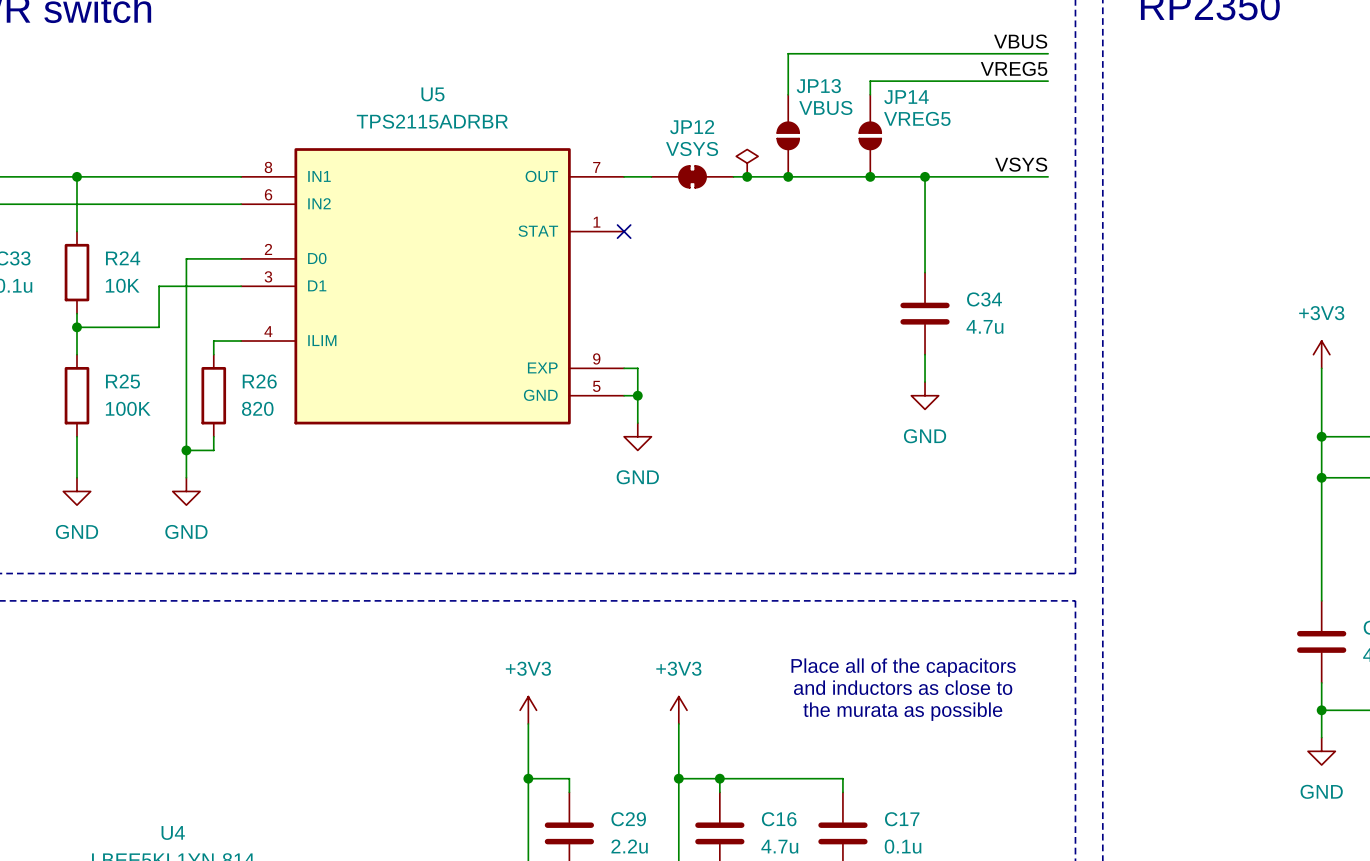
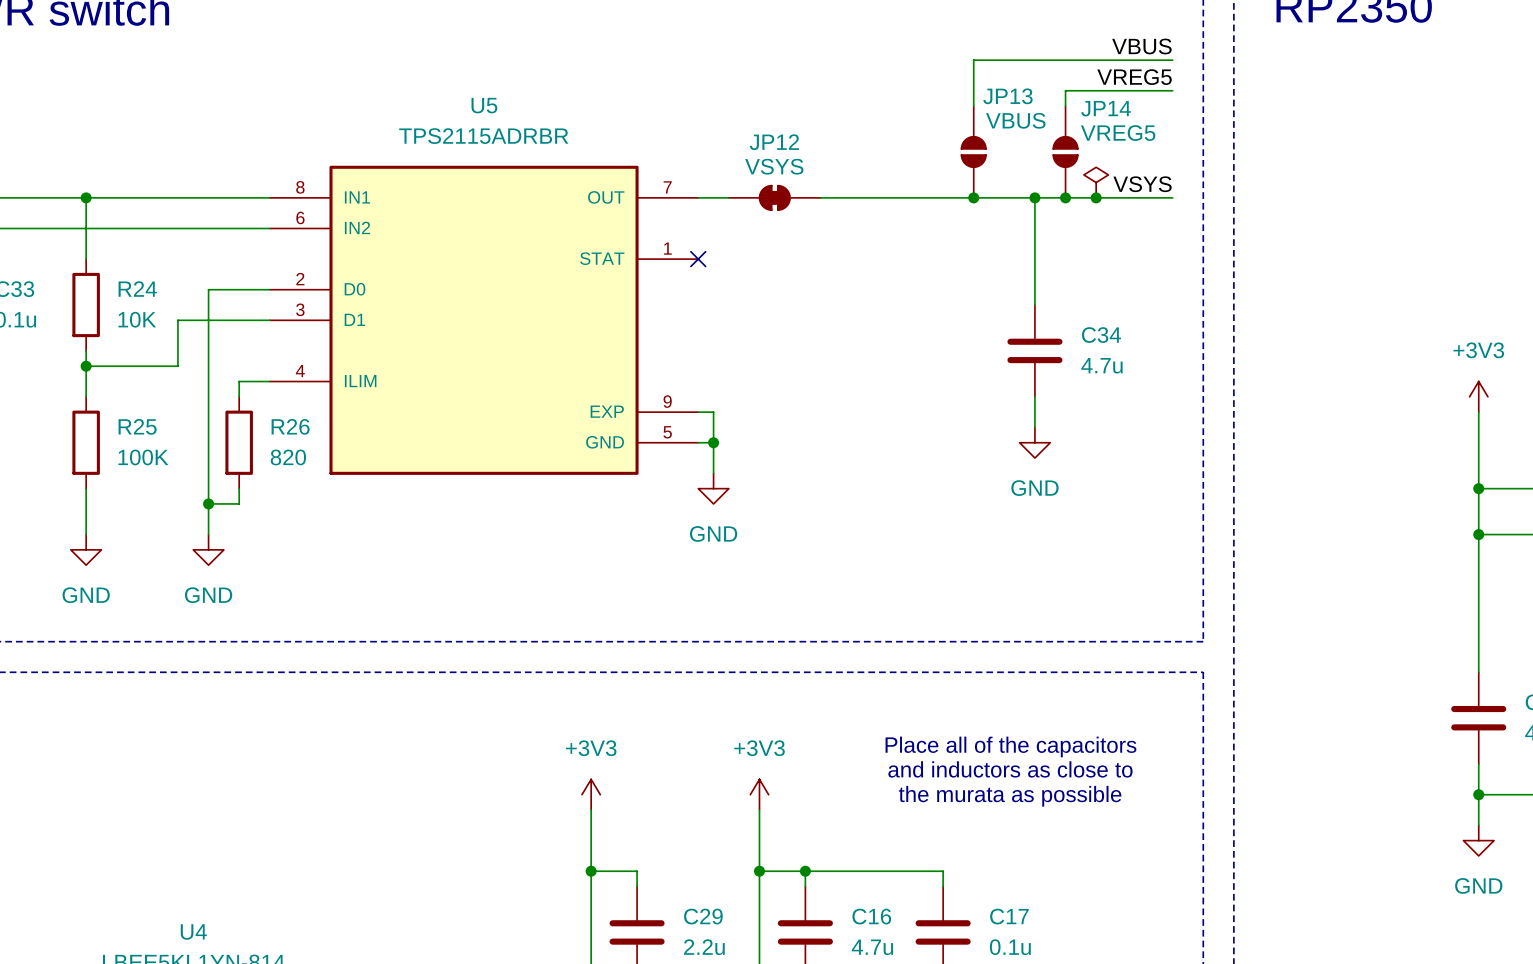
wire: (870, 53) (788, 53) (788, 94) -> (973, 60) (973, 90)
wire: (870, 81) (952, 81) -> (1065, 106) (1065, 90)
JP14 name: JP14 (906, 97) -> JP13 (1007, 96)
JP14 value: VREG5 (917, 118) -> VBUS (1015, 120)
JP13: VBUS (788, 135) -> none
JP14: none -> VREG5 (1065, 151)
power symbol position: (747, 163) -> (1096, 182)
junction: (747, 176) -> none
junction: (788, 176) -> none
junction: none -> (1065, 197)
junction: none -> (1096, 197)

